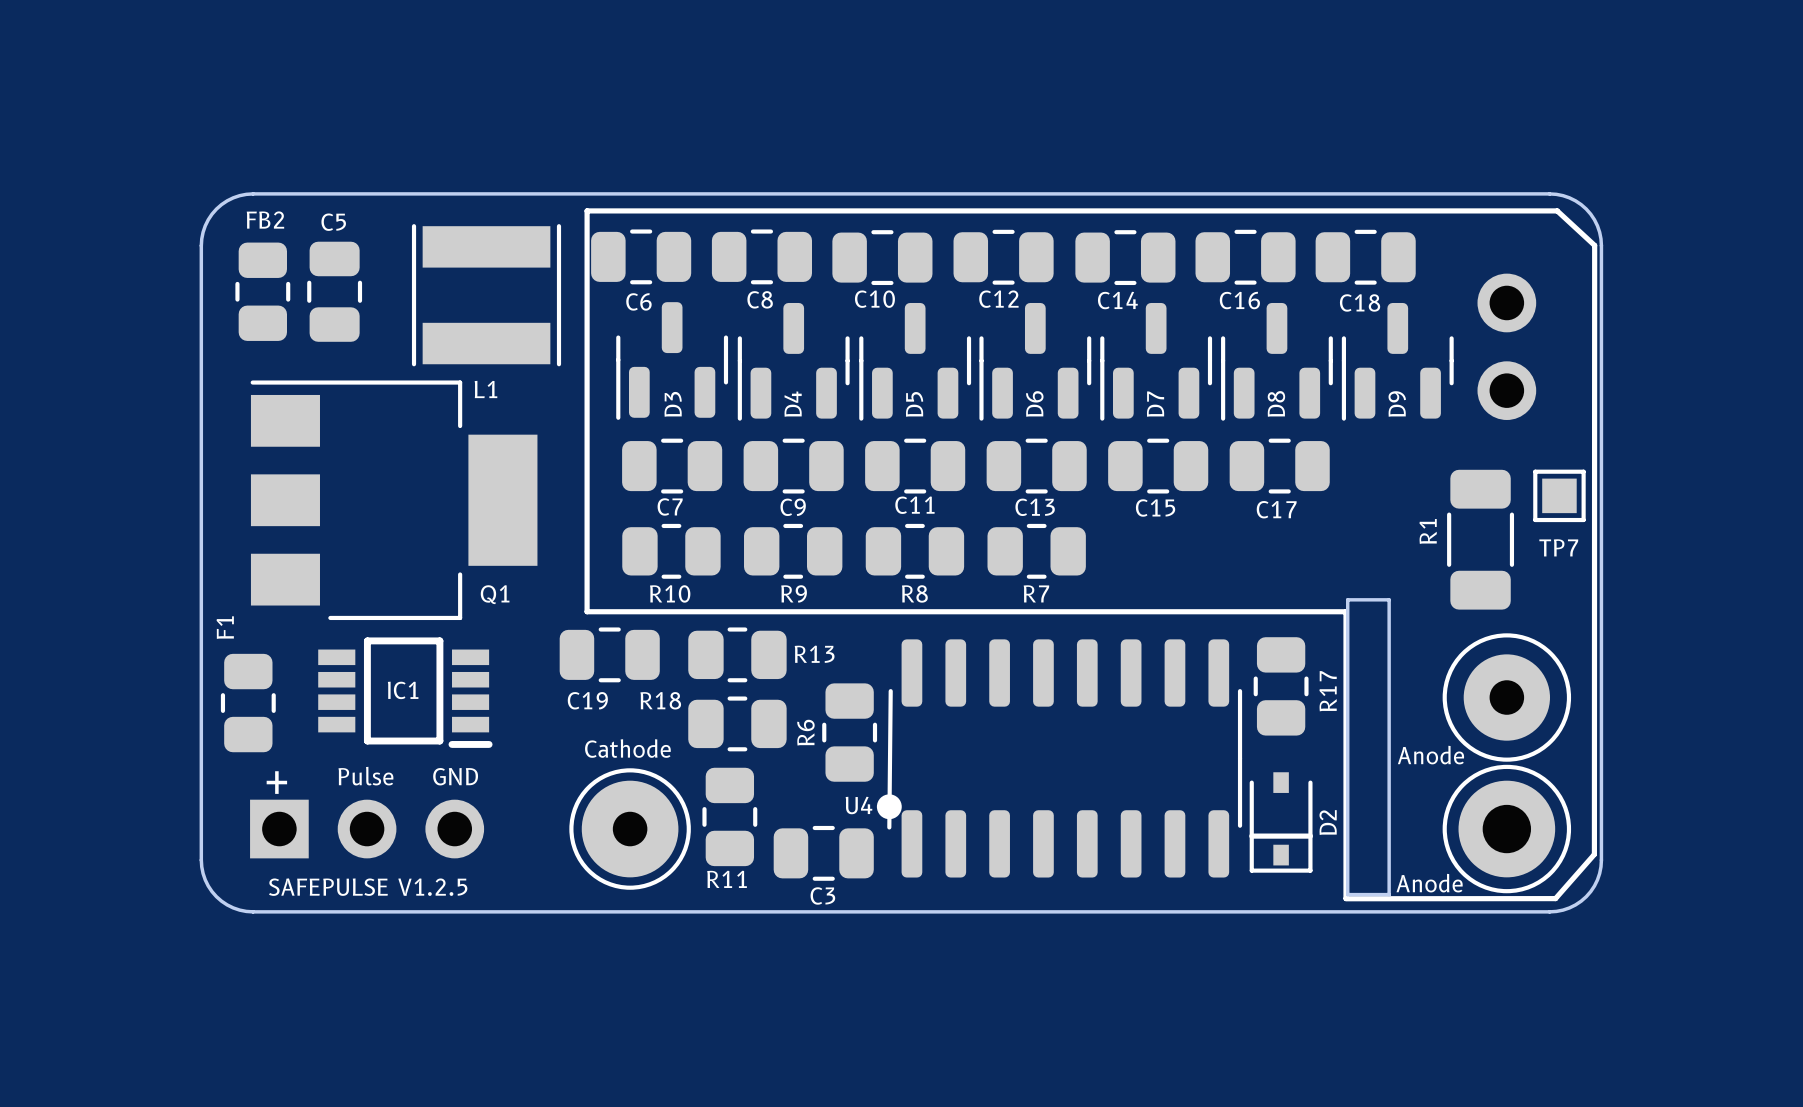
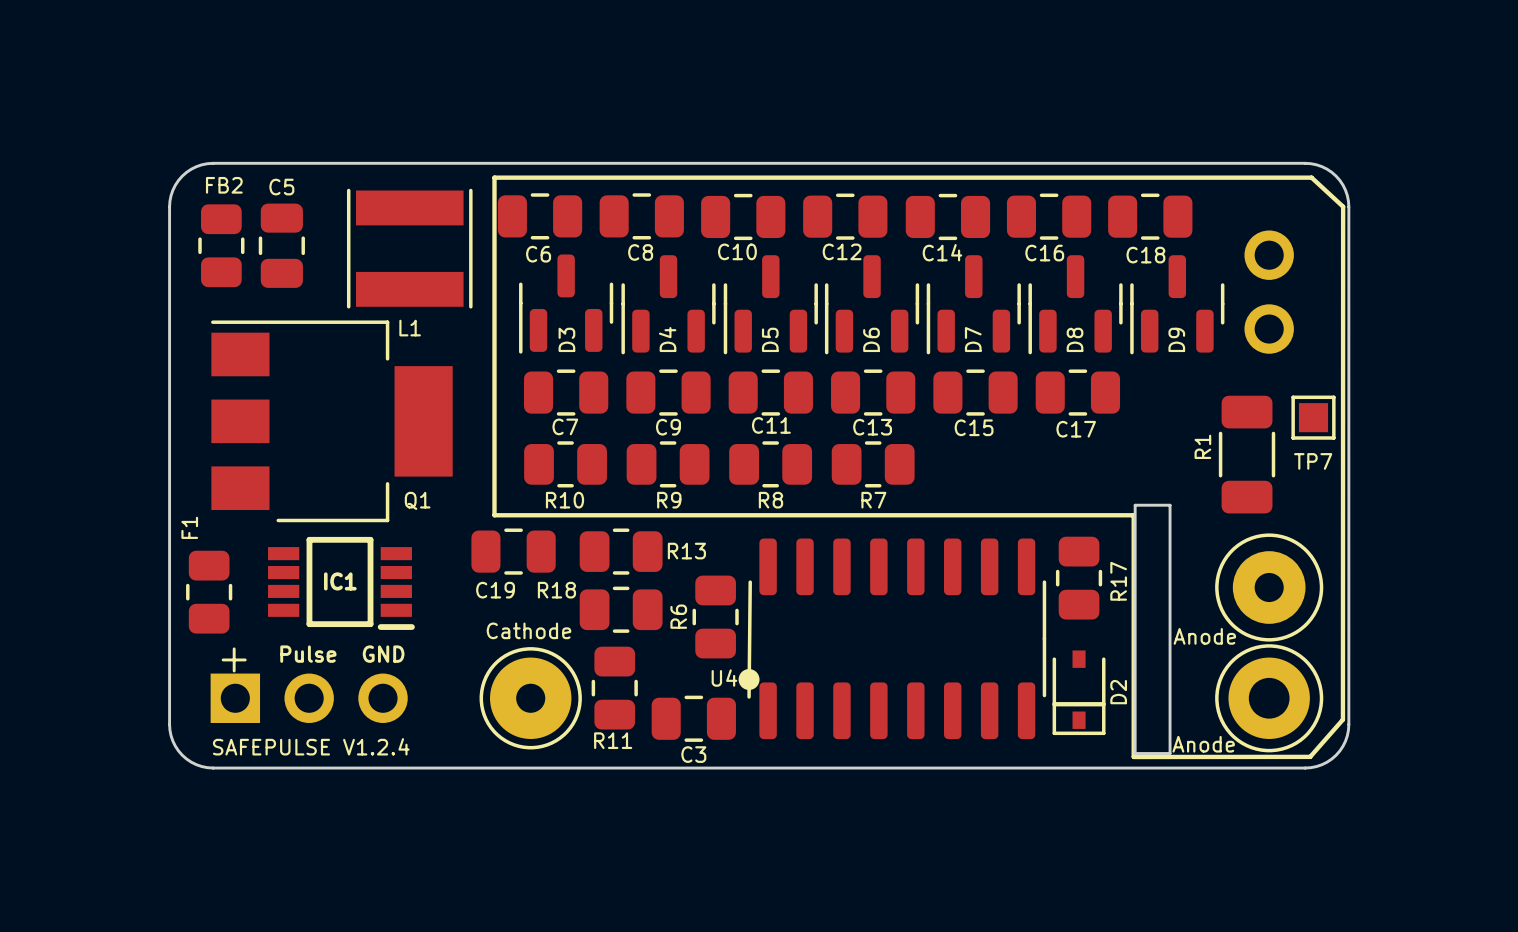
text: SAFEPULSE V1.2.5 (368, 887) -> SAFEPULSE V1.2.4 (311, 746)

